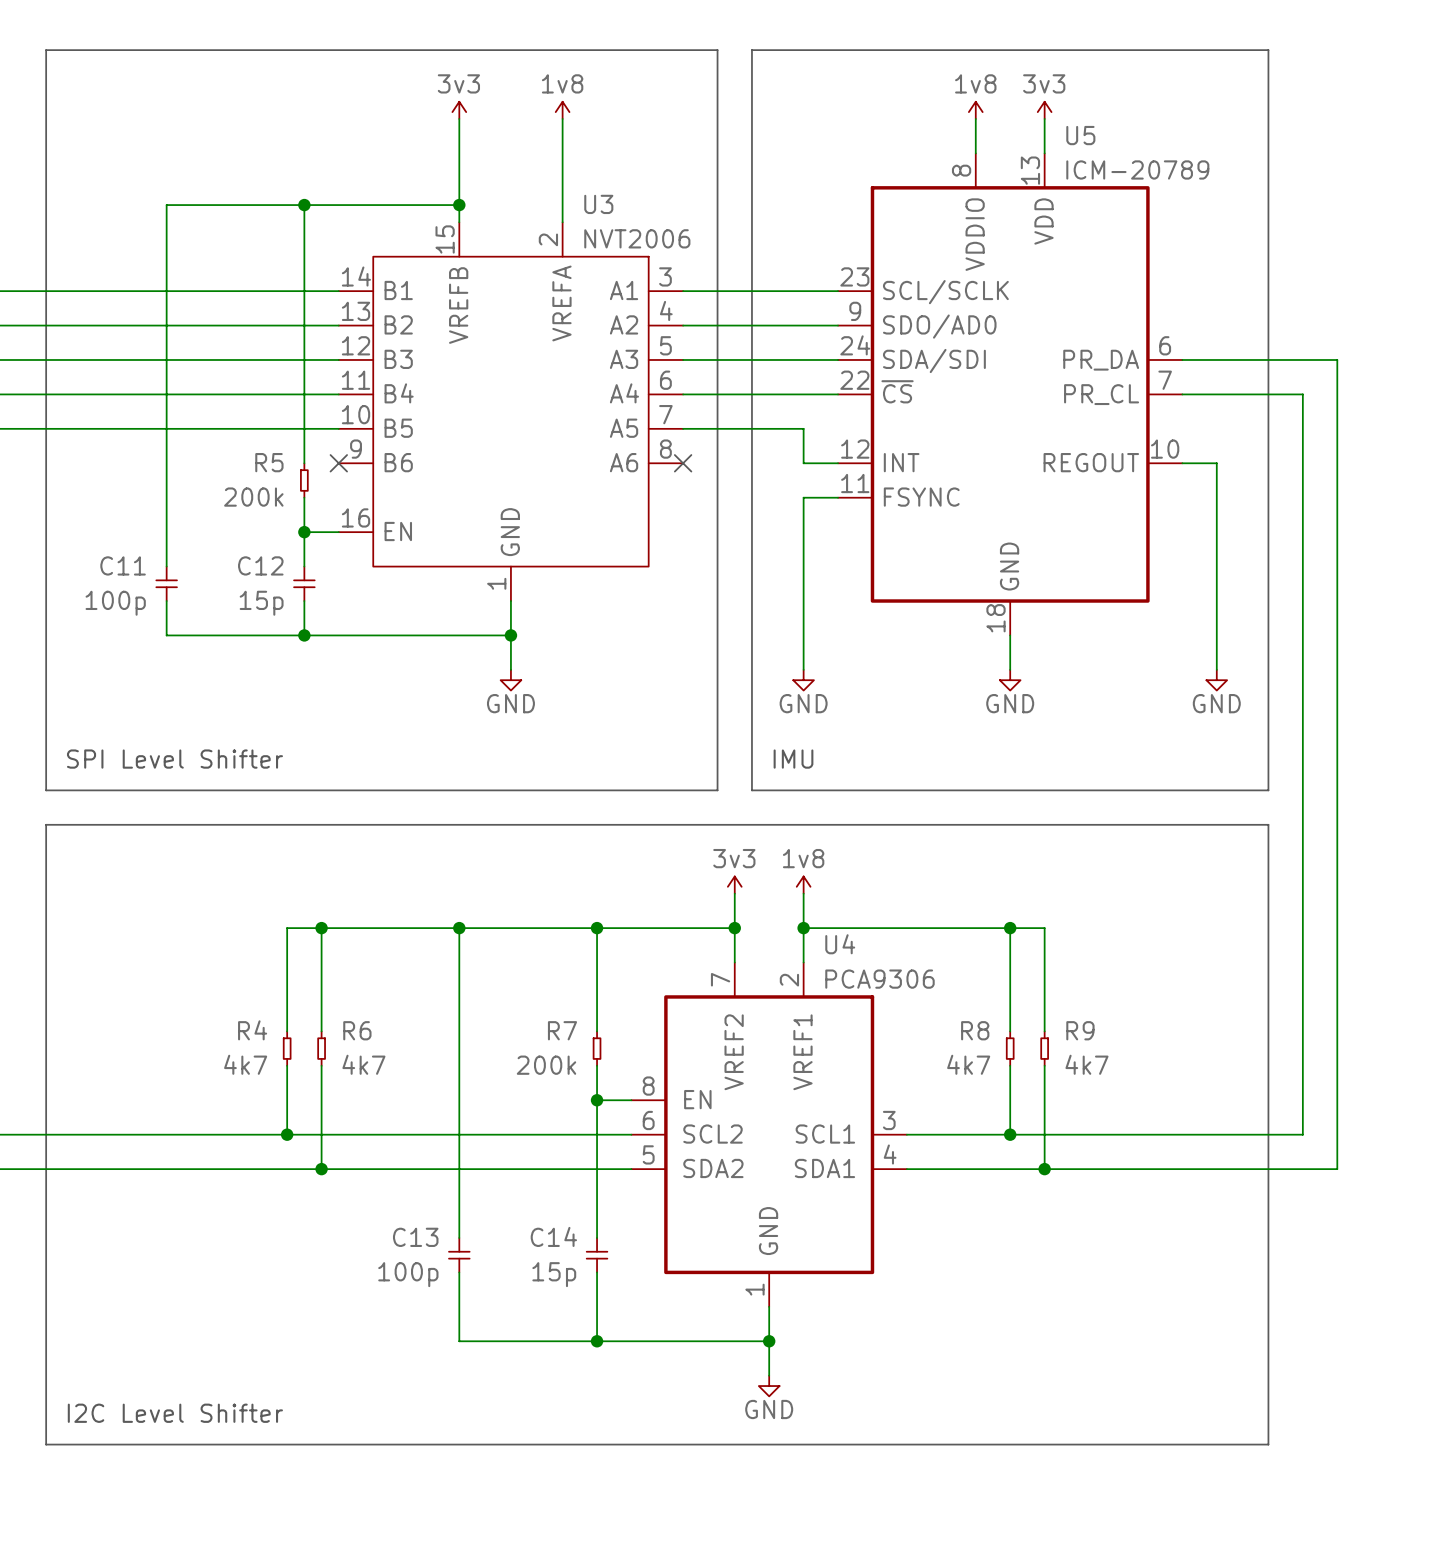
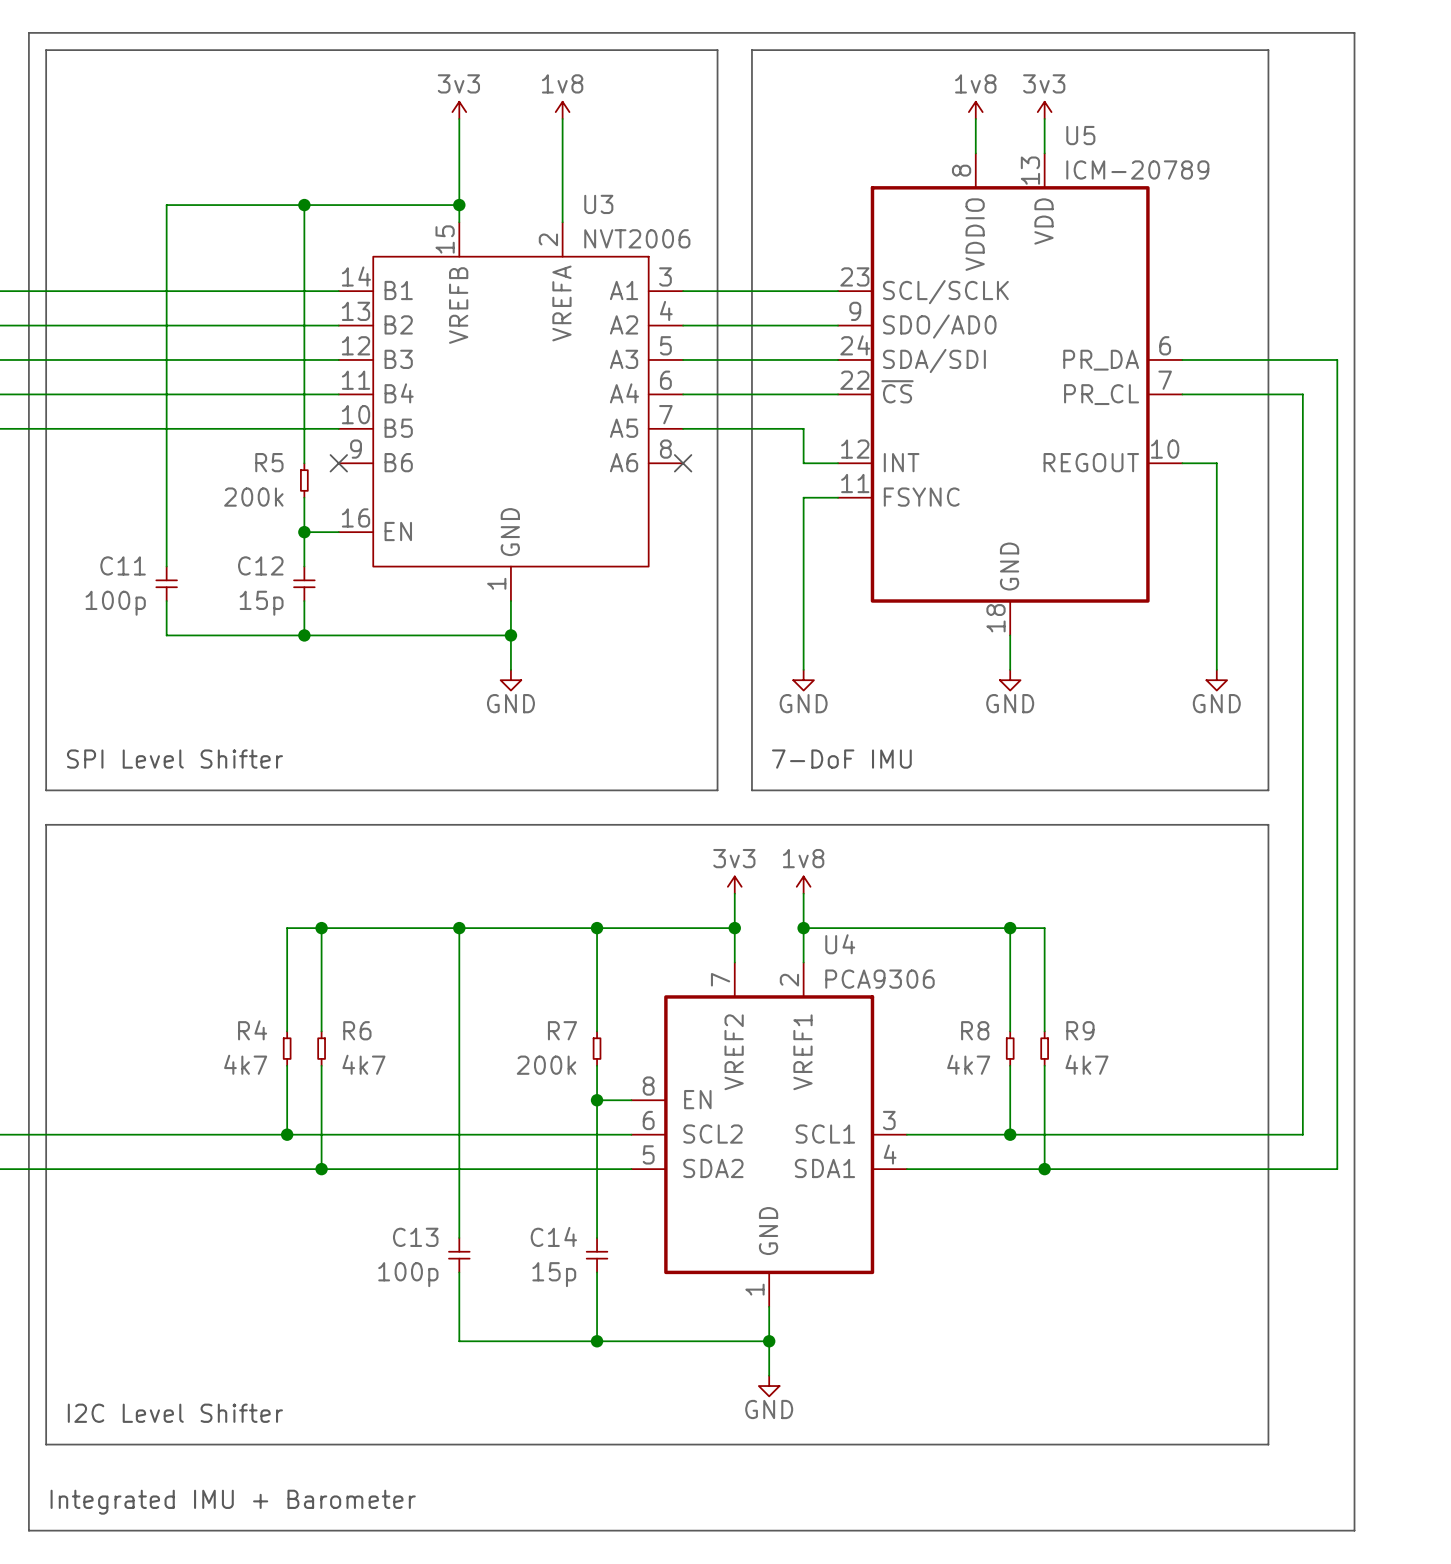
line: none -> (28, 32) (1354, 32) (1354, 1530) (28, 1530) (28, 32)
text: IMU (793, 759) -> 7-DoF IMU (841, 759)
text: none -> Integrated IMU + Barometer (233, 1502)

